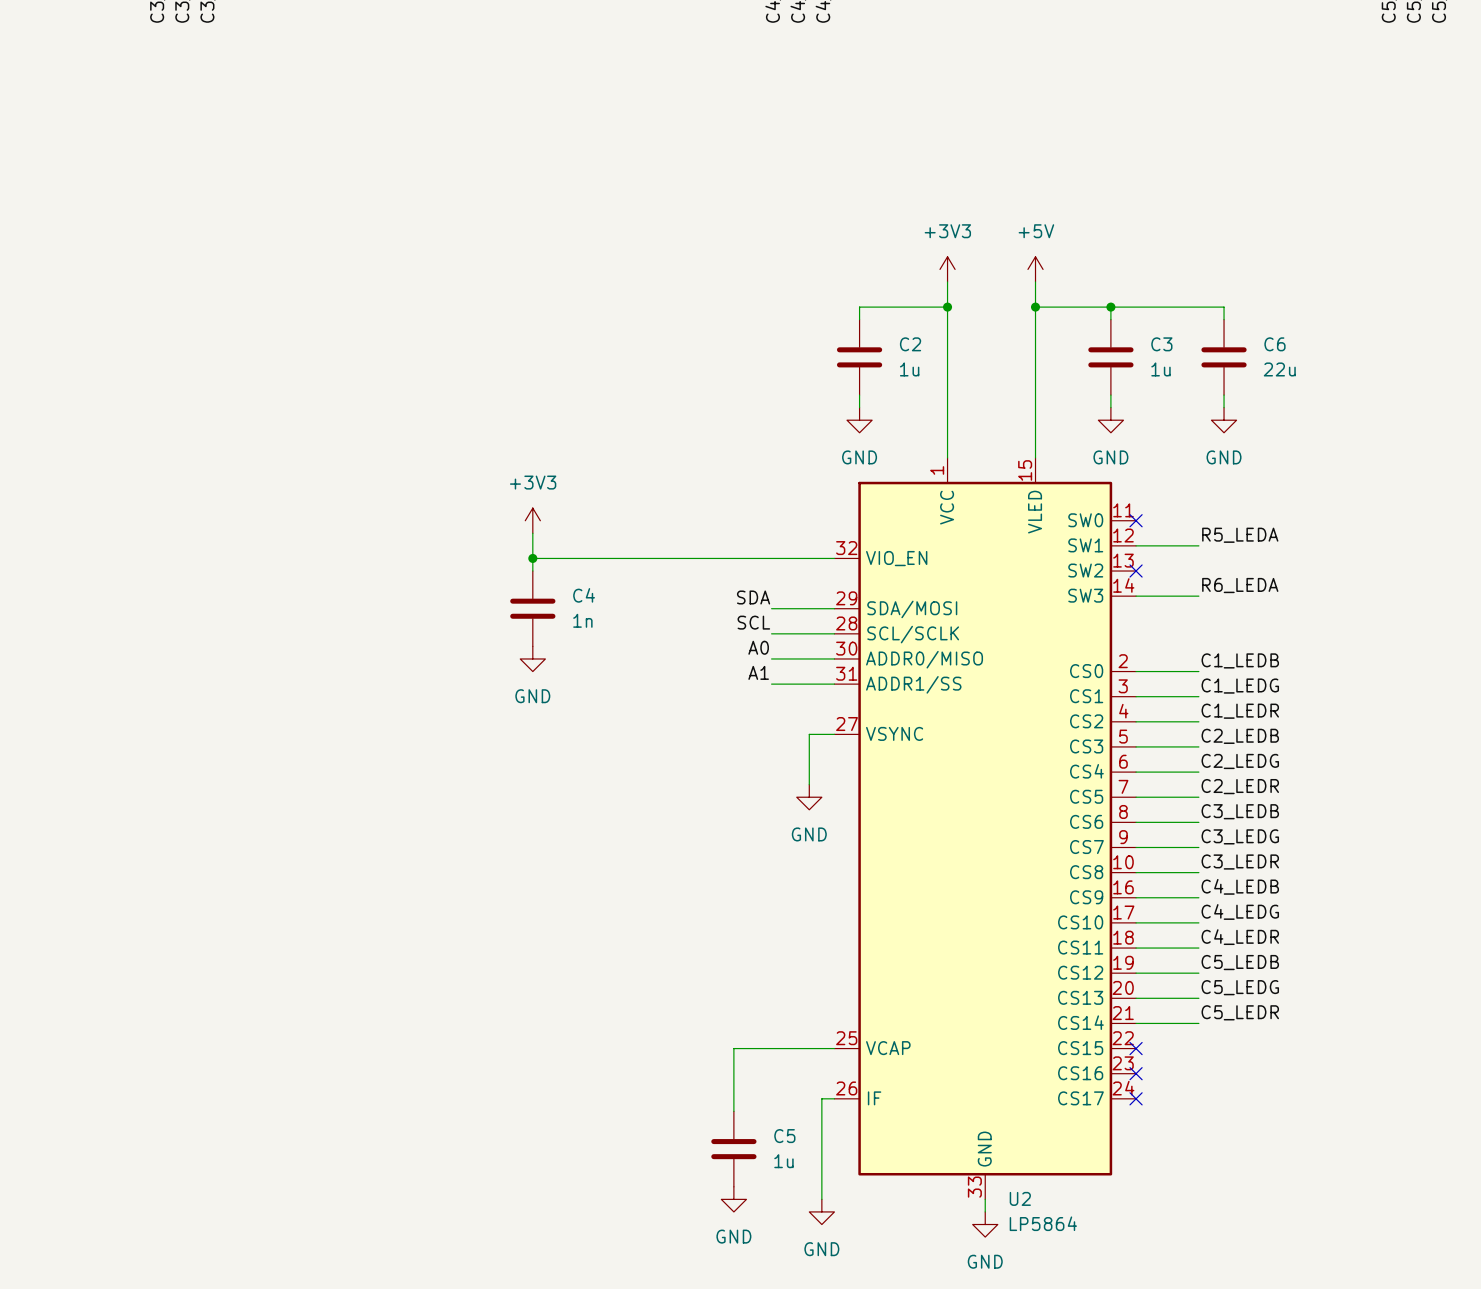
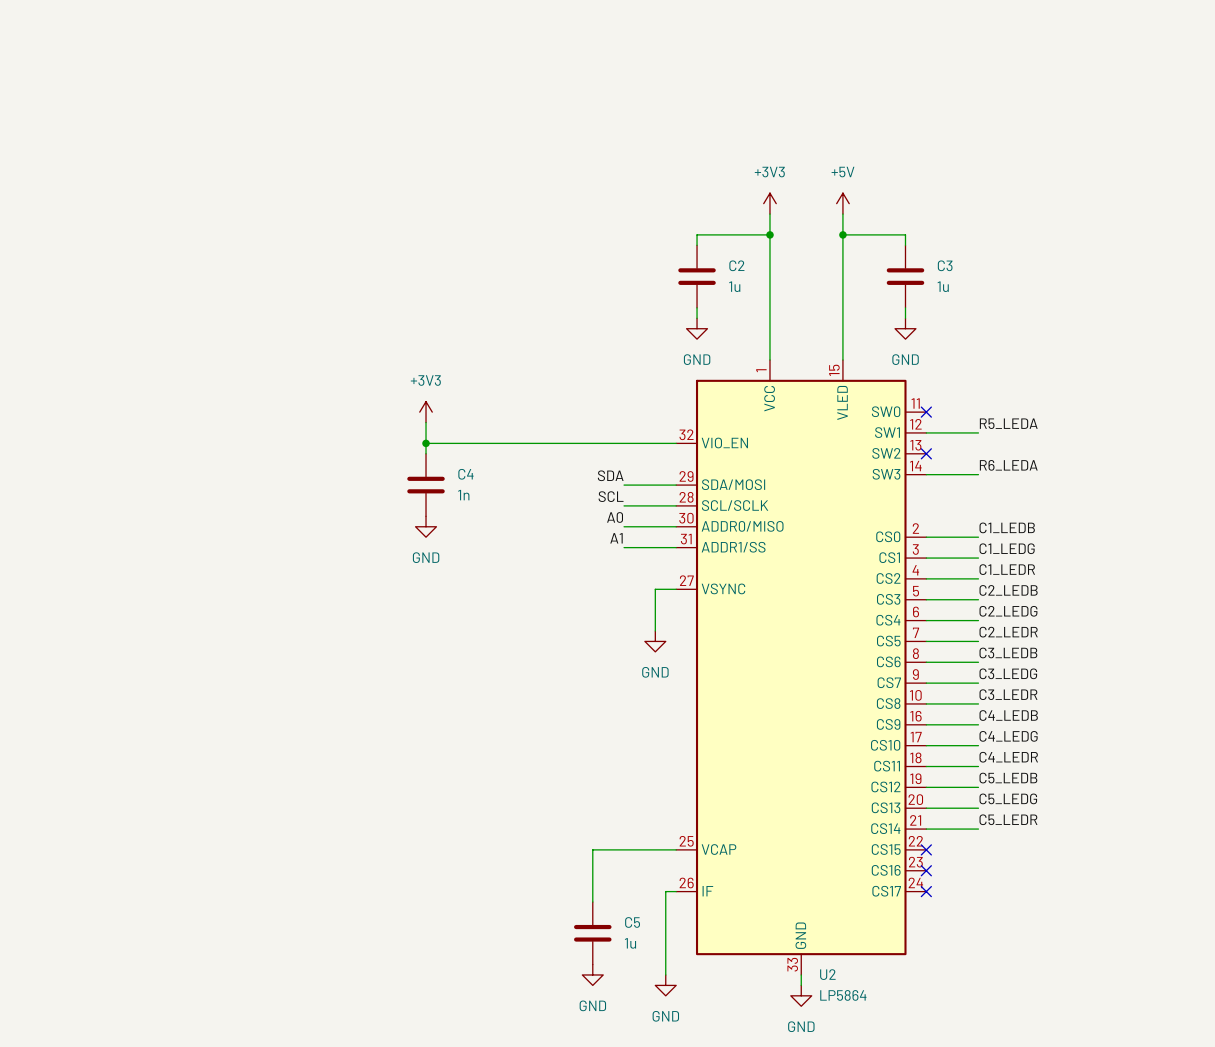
wire: (1110, 307) (1224, 307) (1224, 319) -> none
junction: (1110, 307) -> none
C6: 22u (1224, 357) -> none
wire: (1224, 395) (1224, 407) -> none
power symbol: GND (1224, 420) -> none

